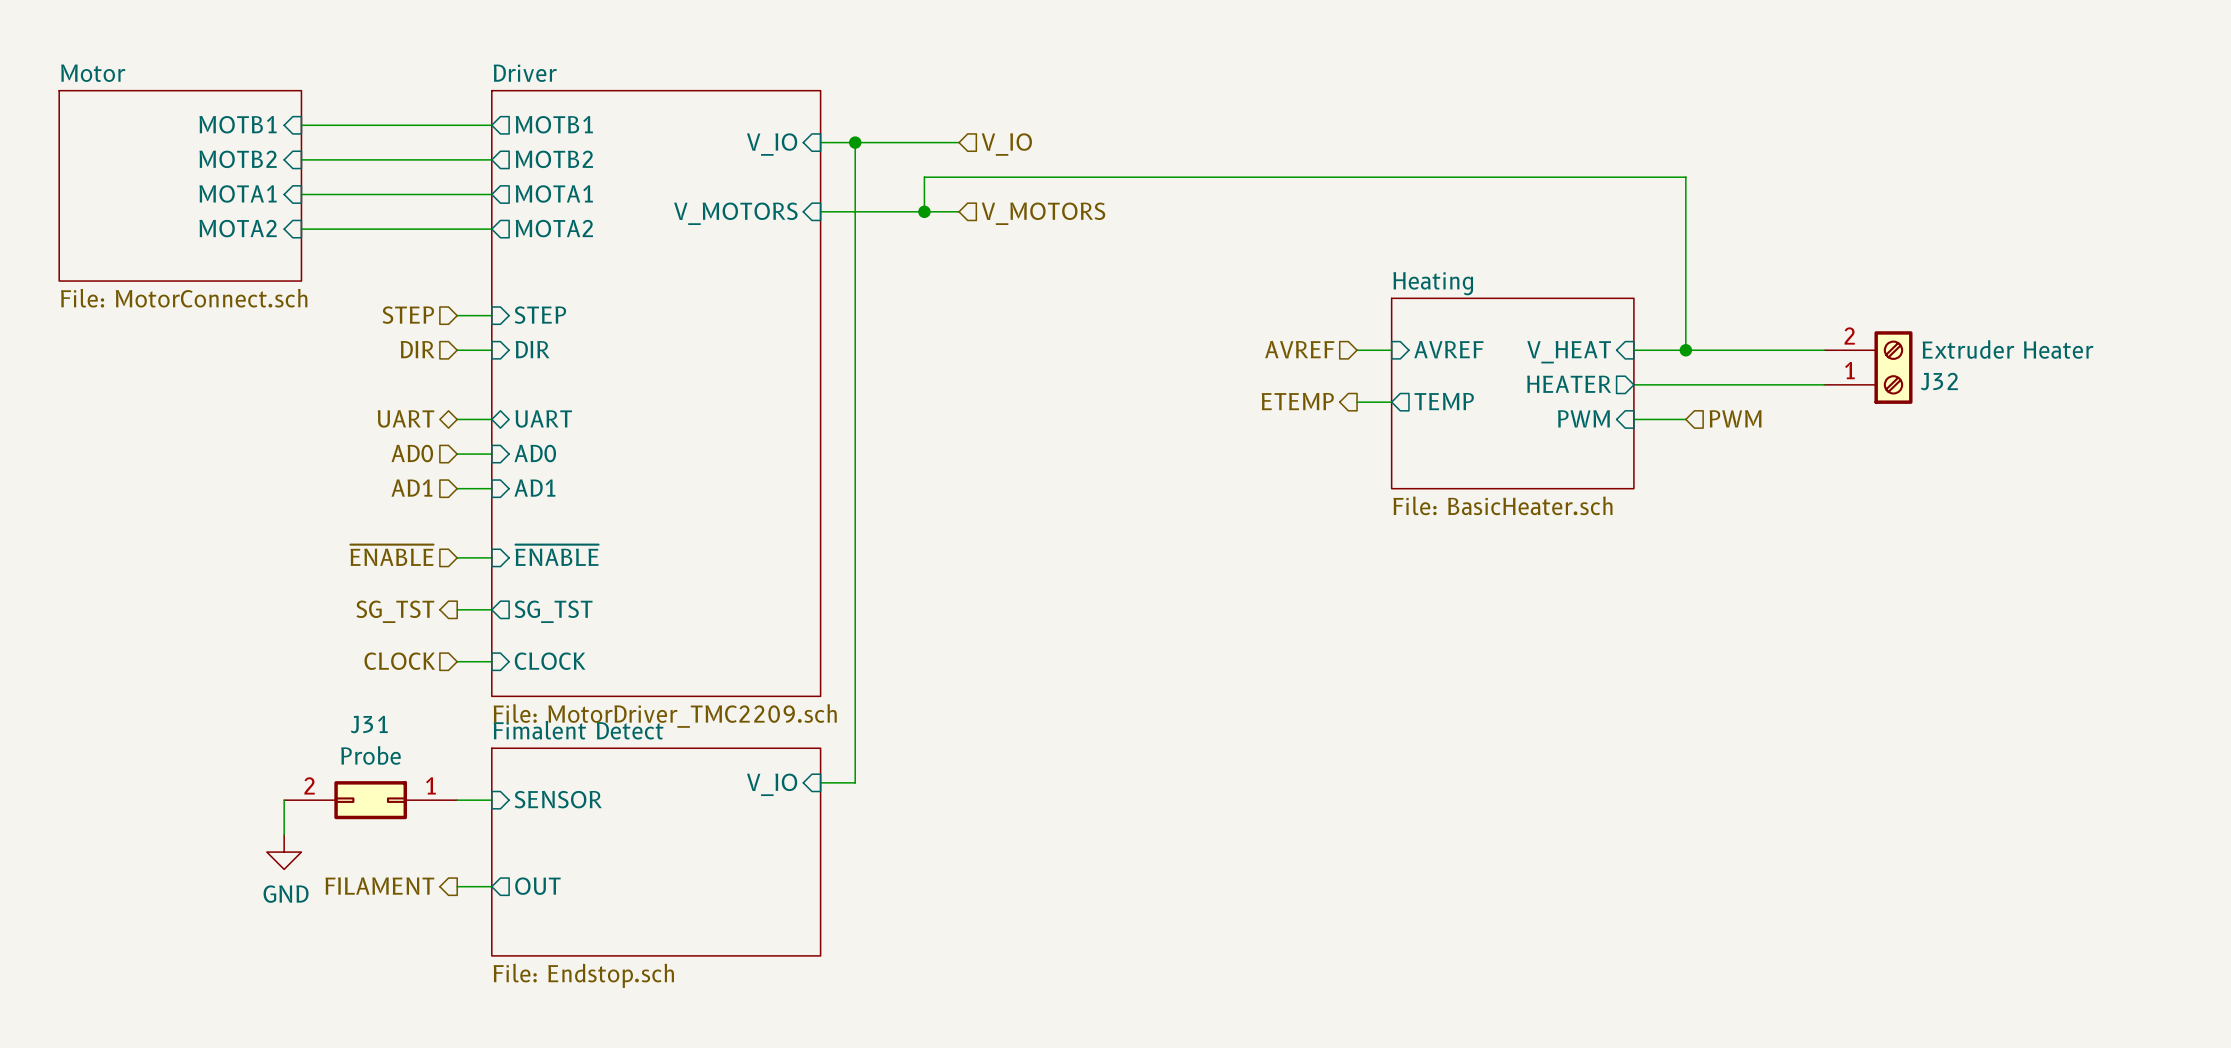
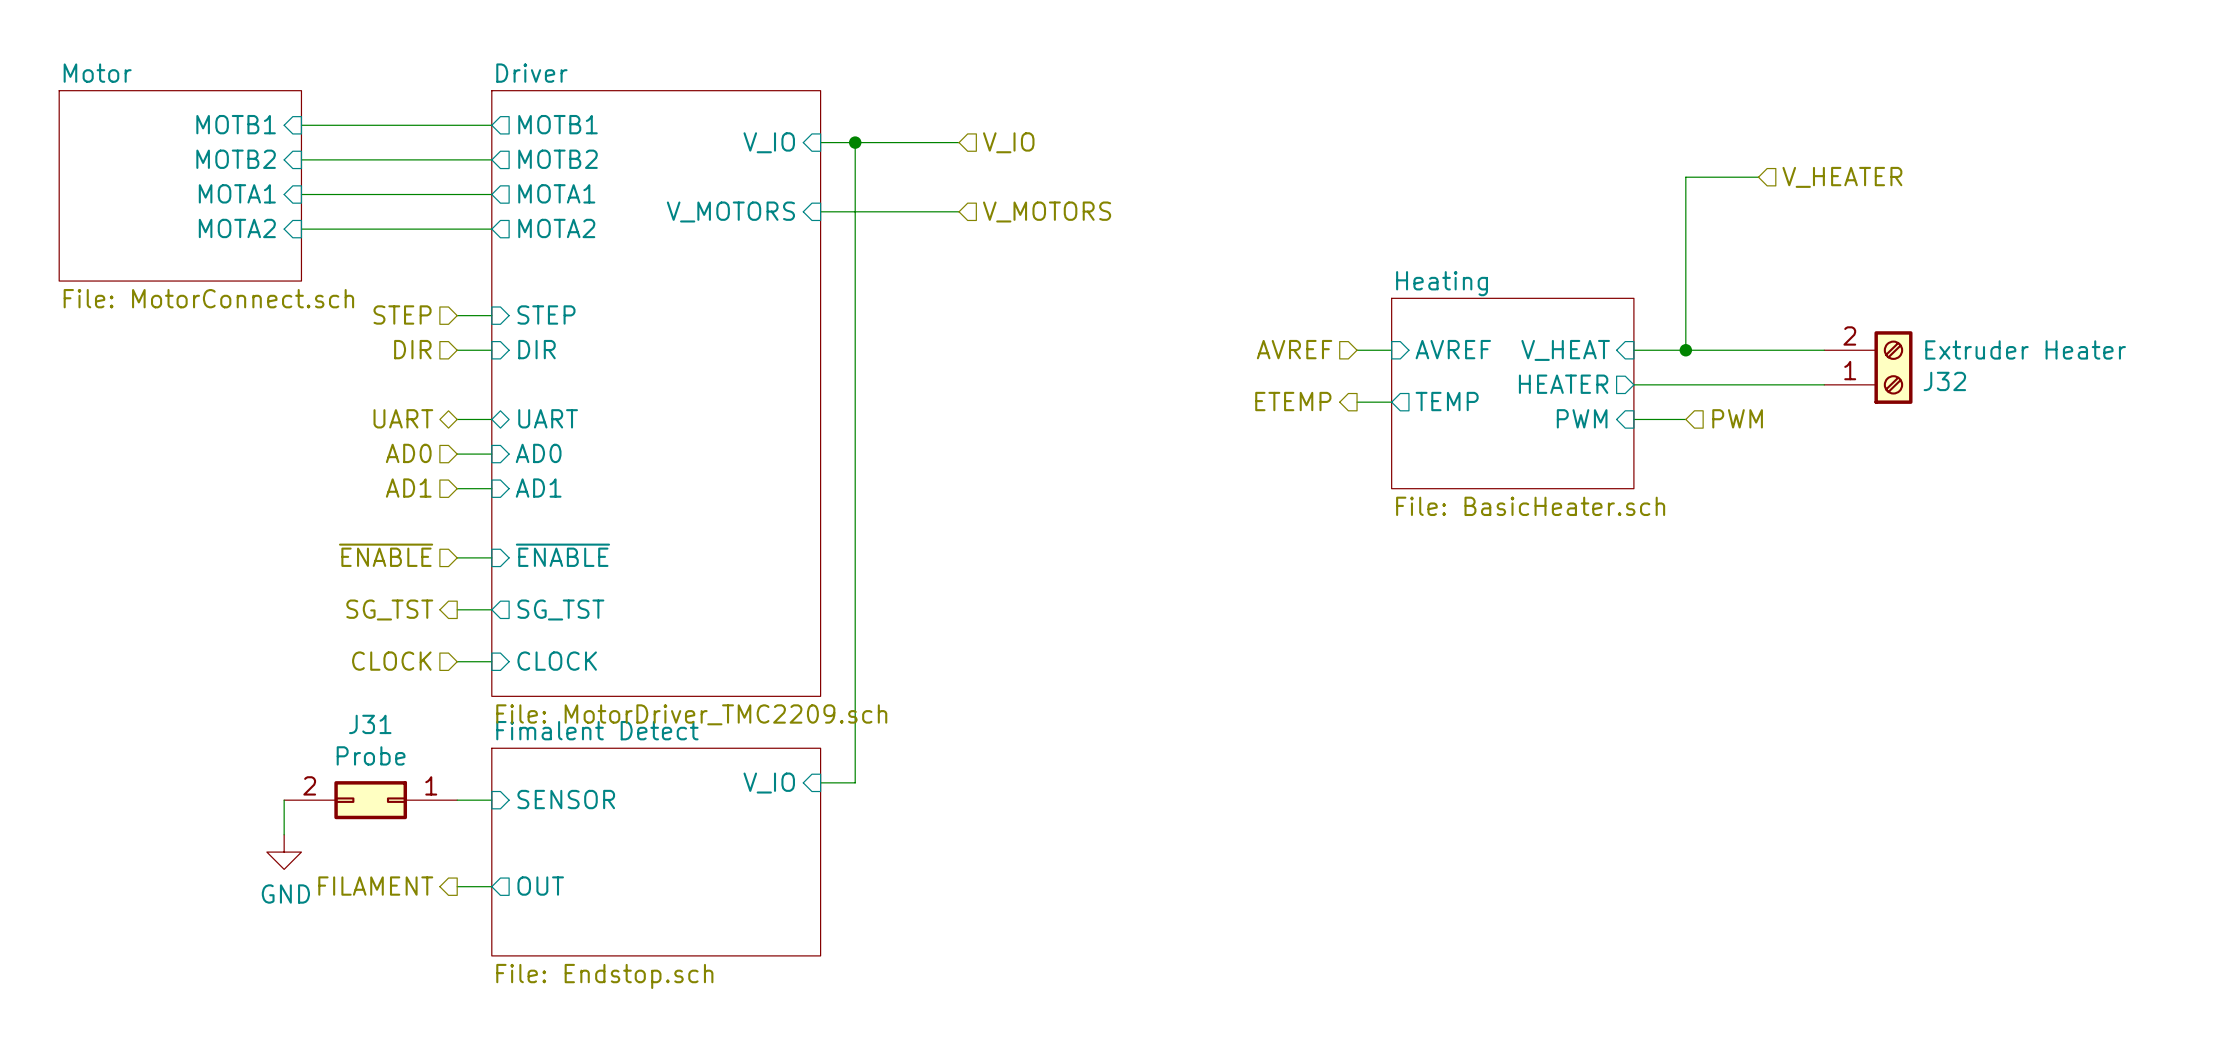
wire: (1685, 177) (924, 177) (924, 211) -> (1685, 177) (1758, 177)
hierarchical label: none -> V_HEATER (1842, 177)
junction: (924, 211) -> none

